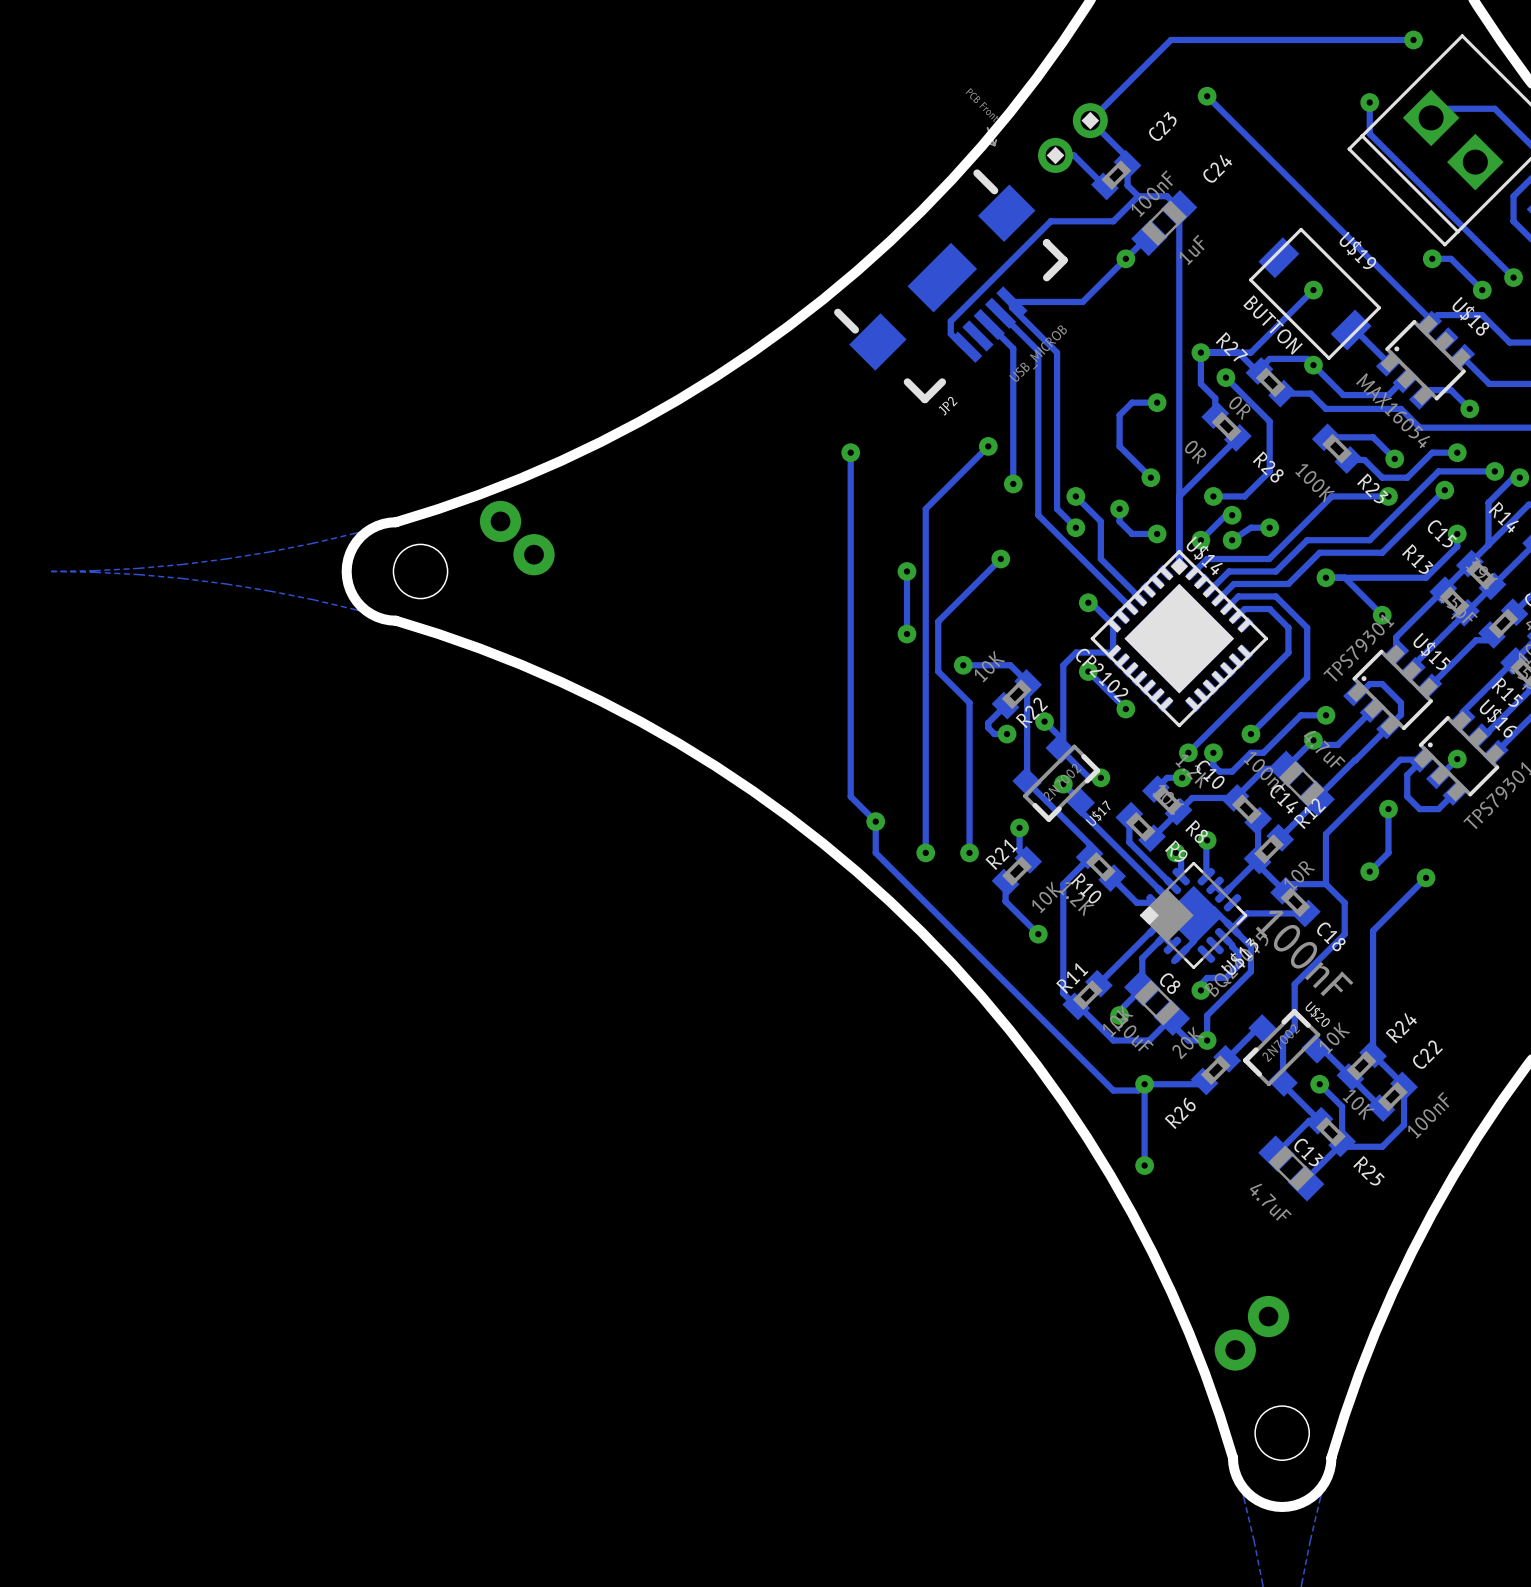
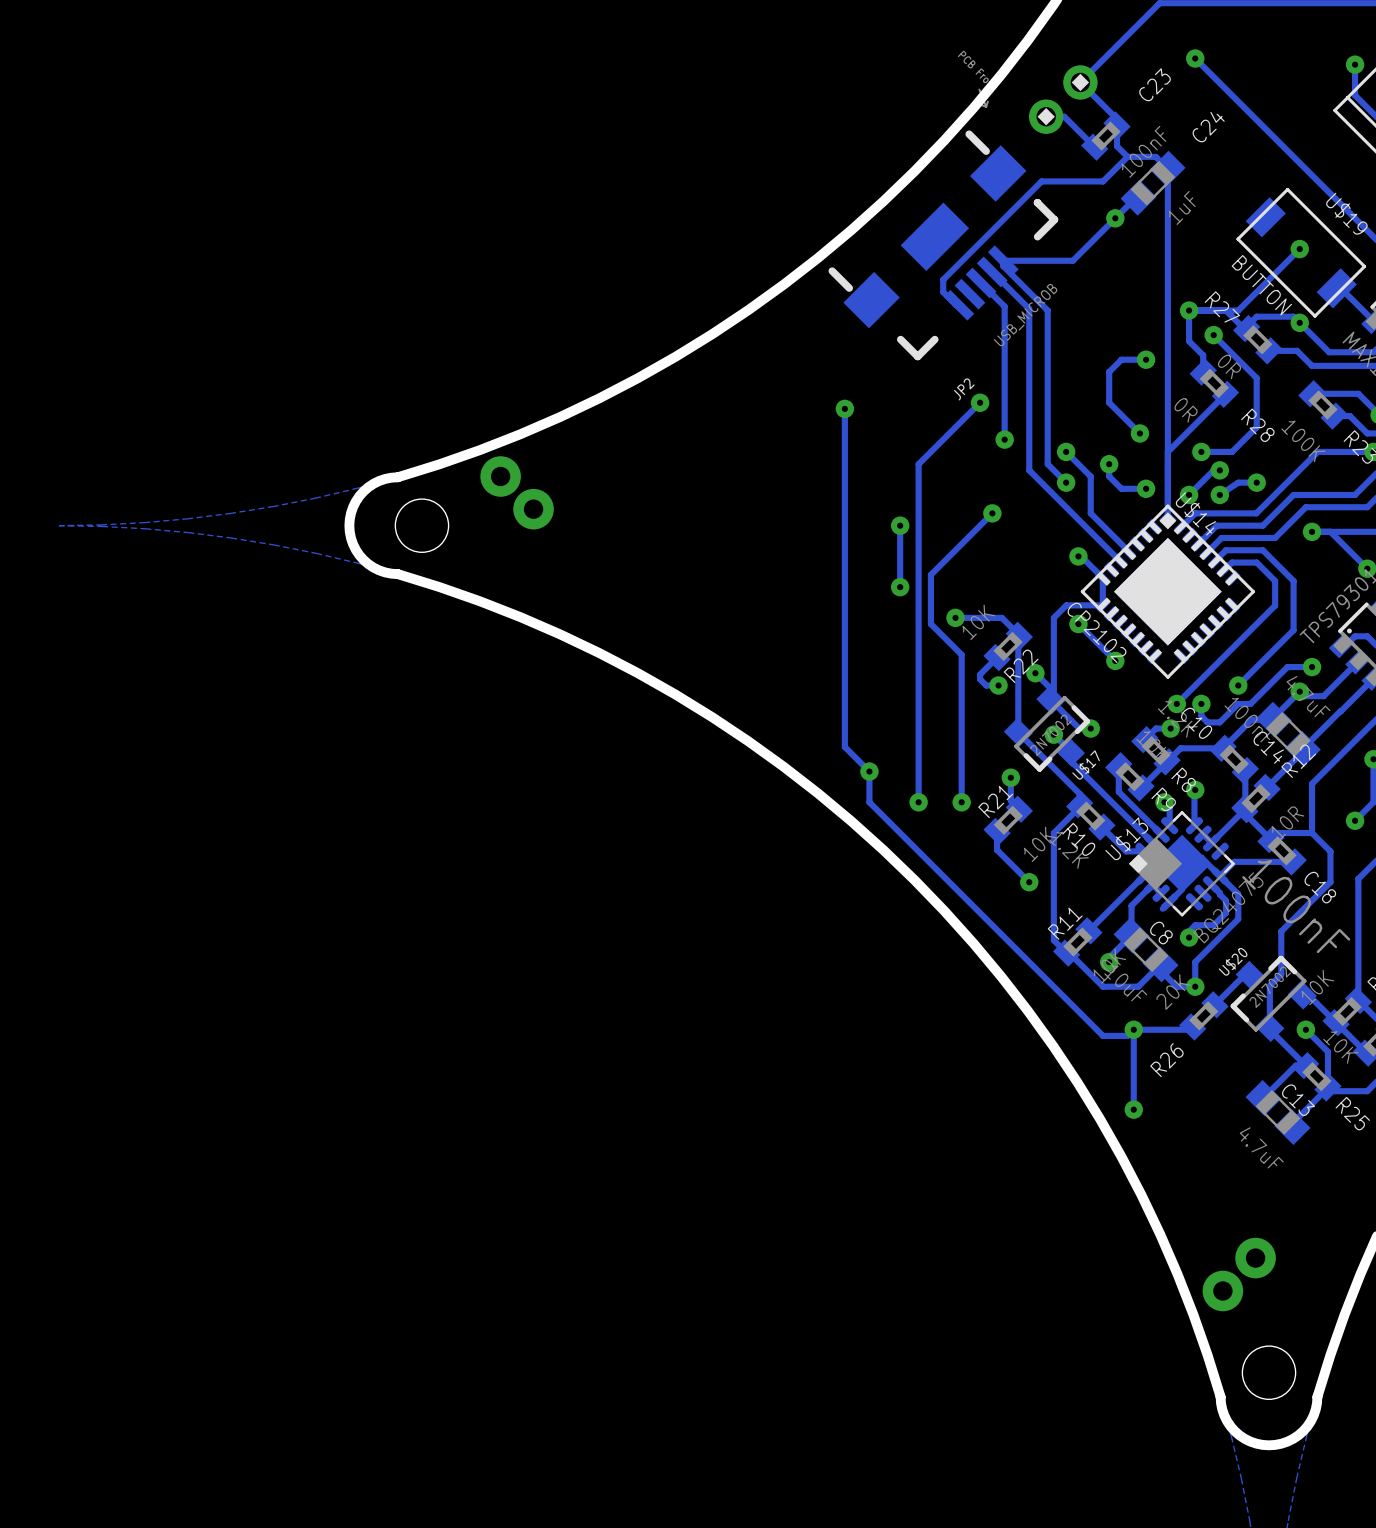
JP2 name position: JP2 (948, 406) -> JP2 (964, 389)
U$13 name position: U$13 (1239, 956) -> U$13 (1126, 838)
U$20 name rotation: 0° (1317, 1014) -> 90° counterclockwise (1233, 961)
U$20 name position: U$20 (1317, 1014) -> U$20 (1233, 961)

